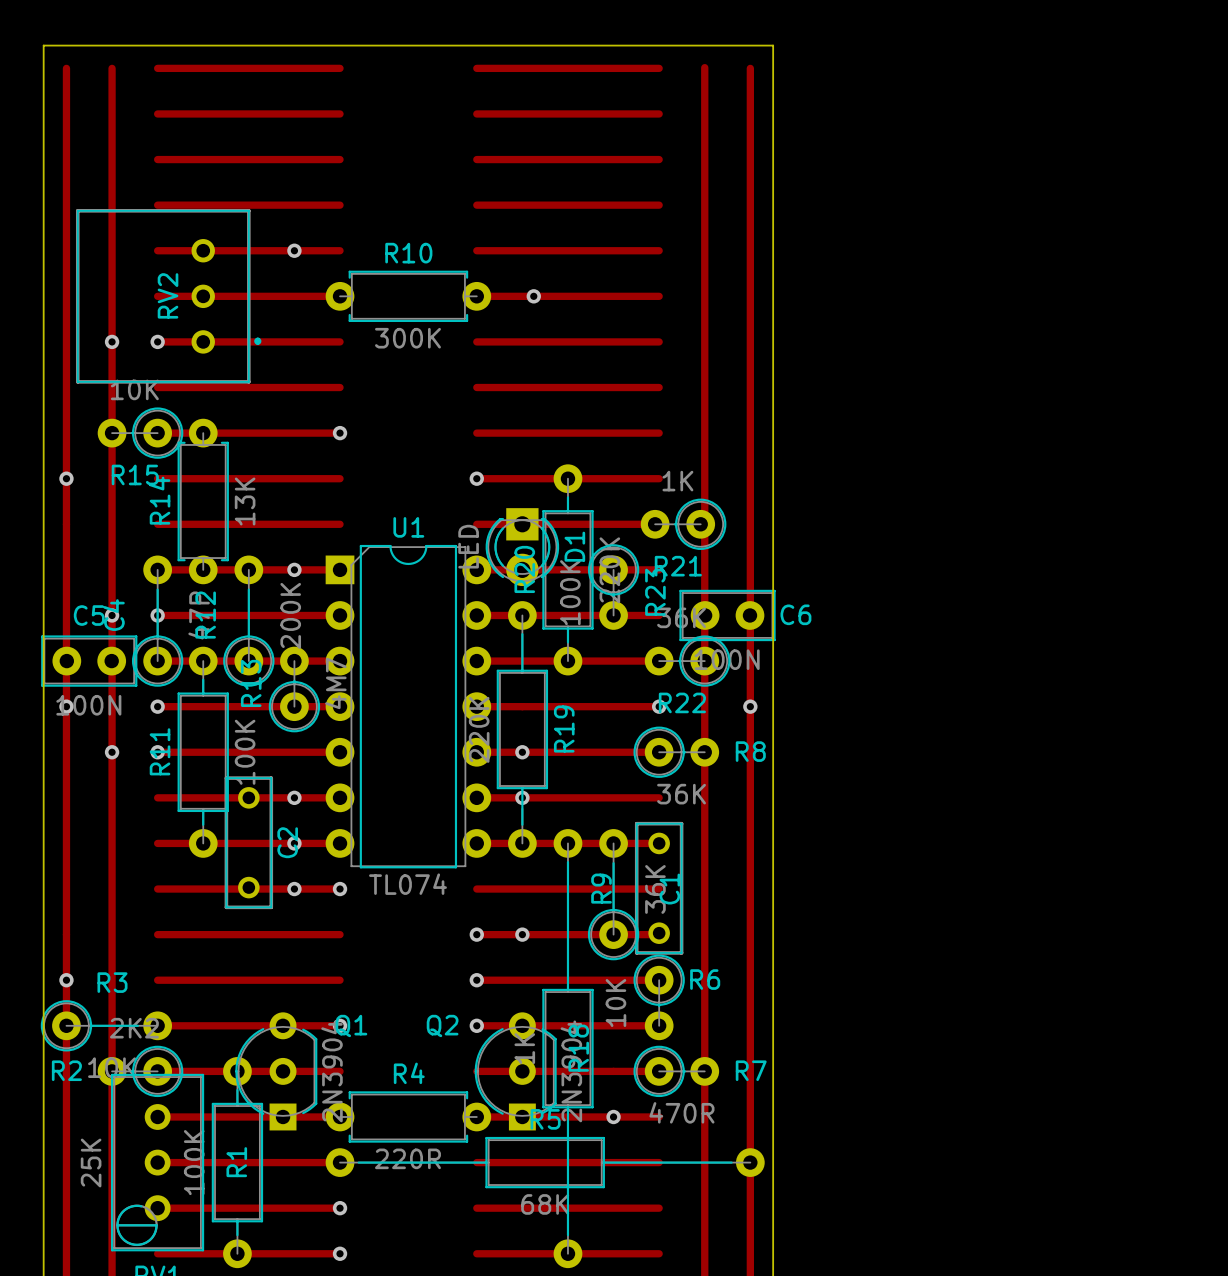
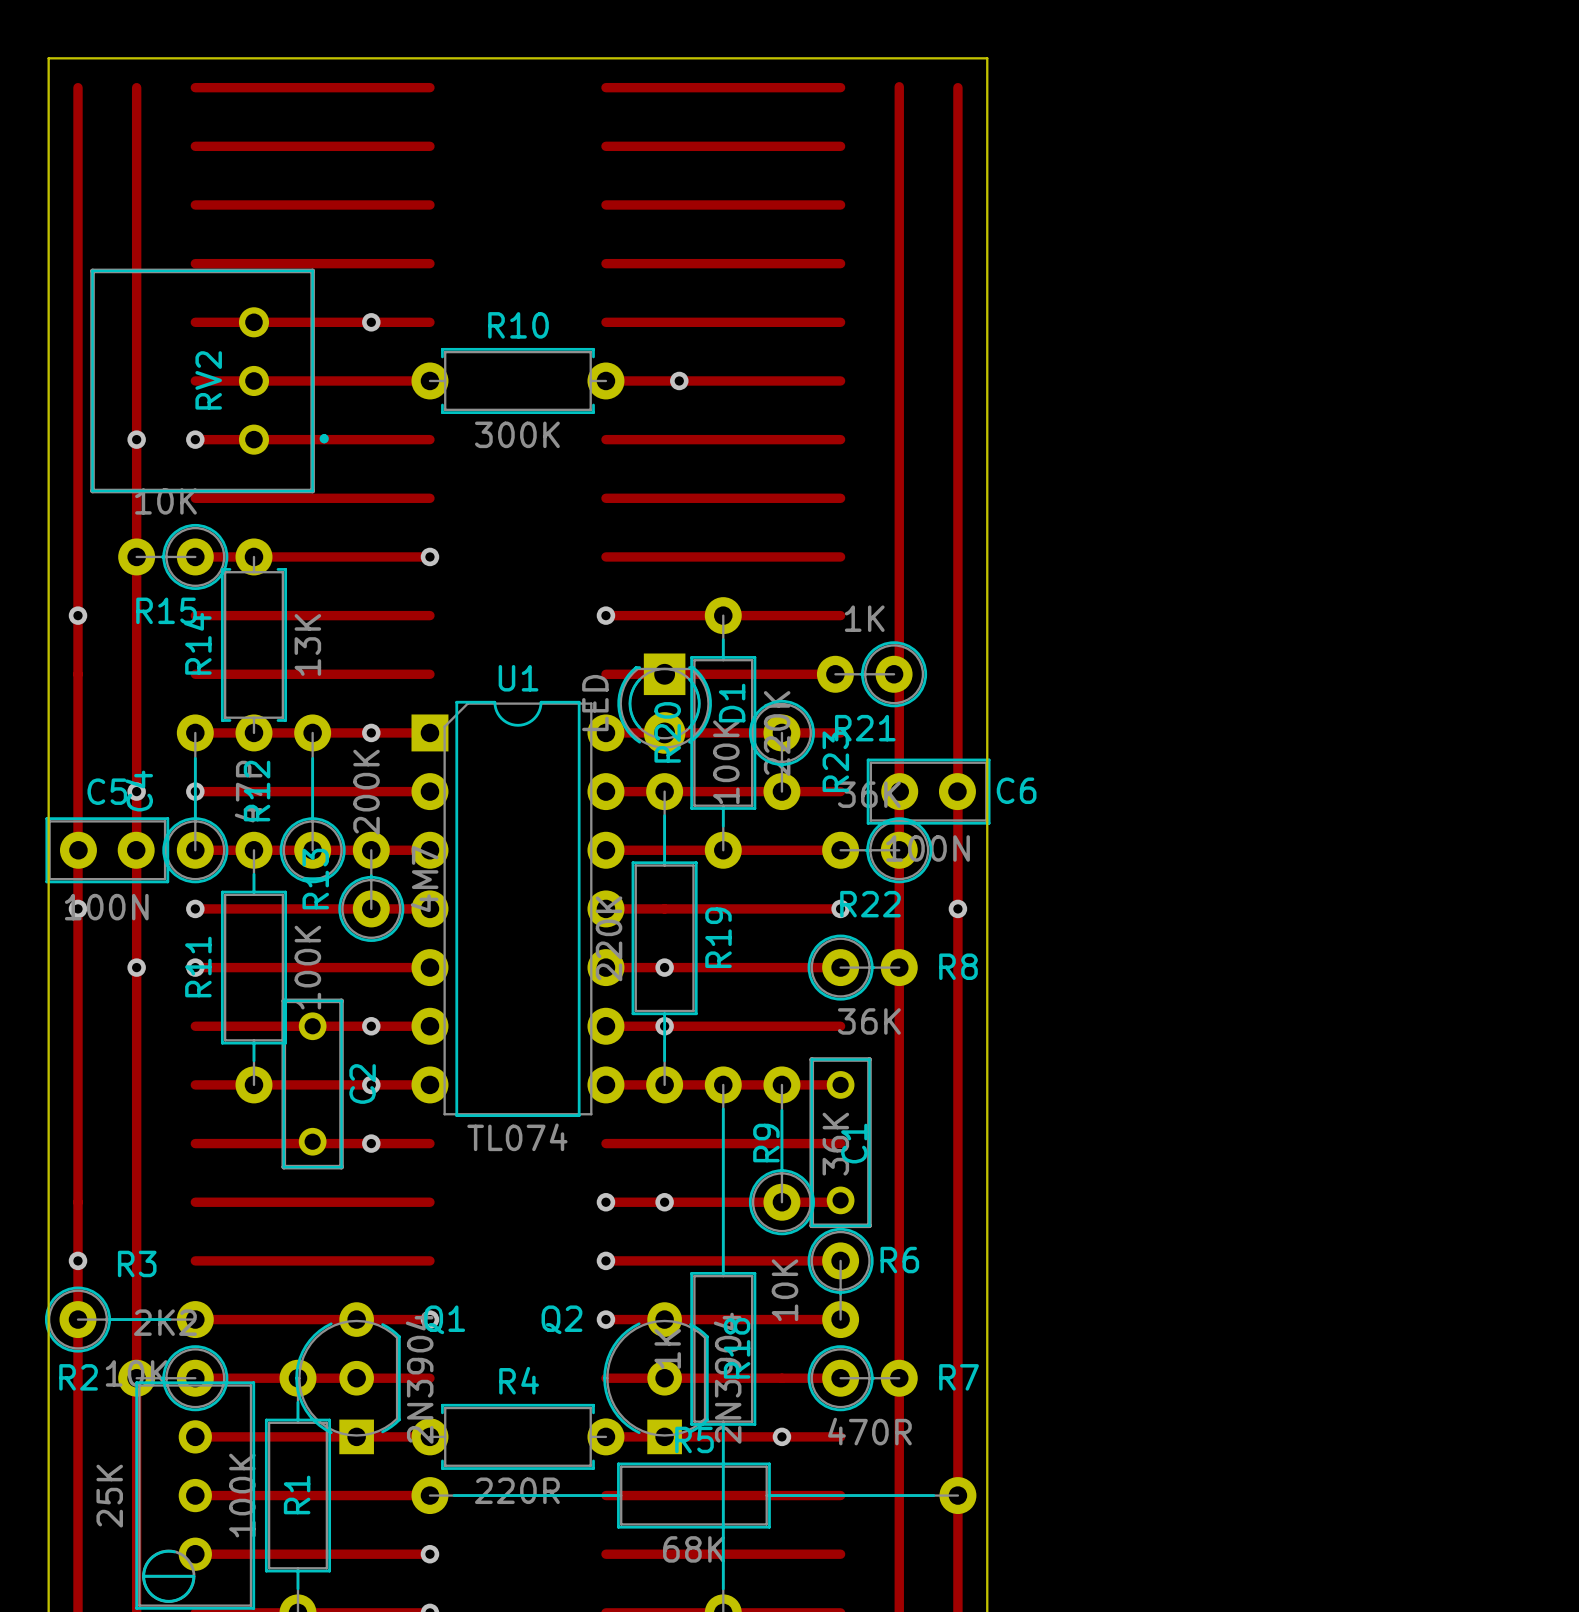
via: (340, 889) -> none

